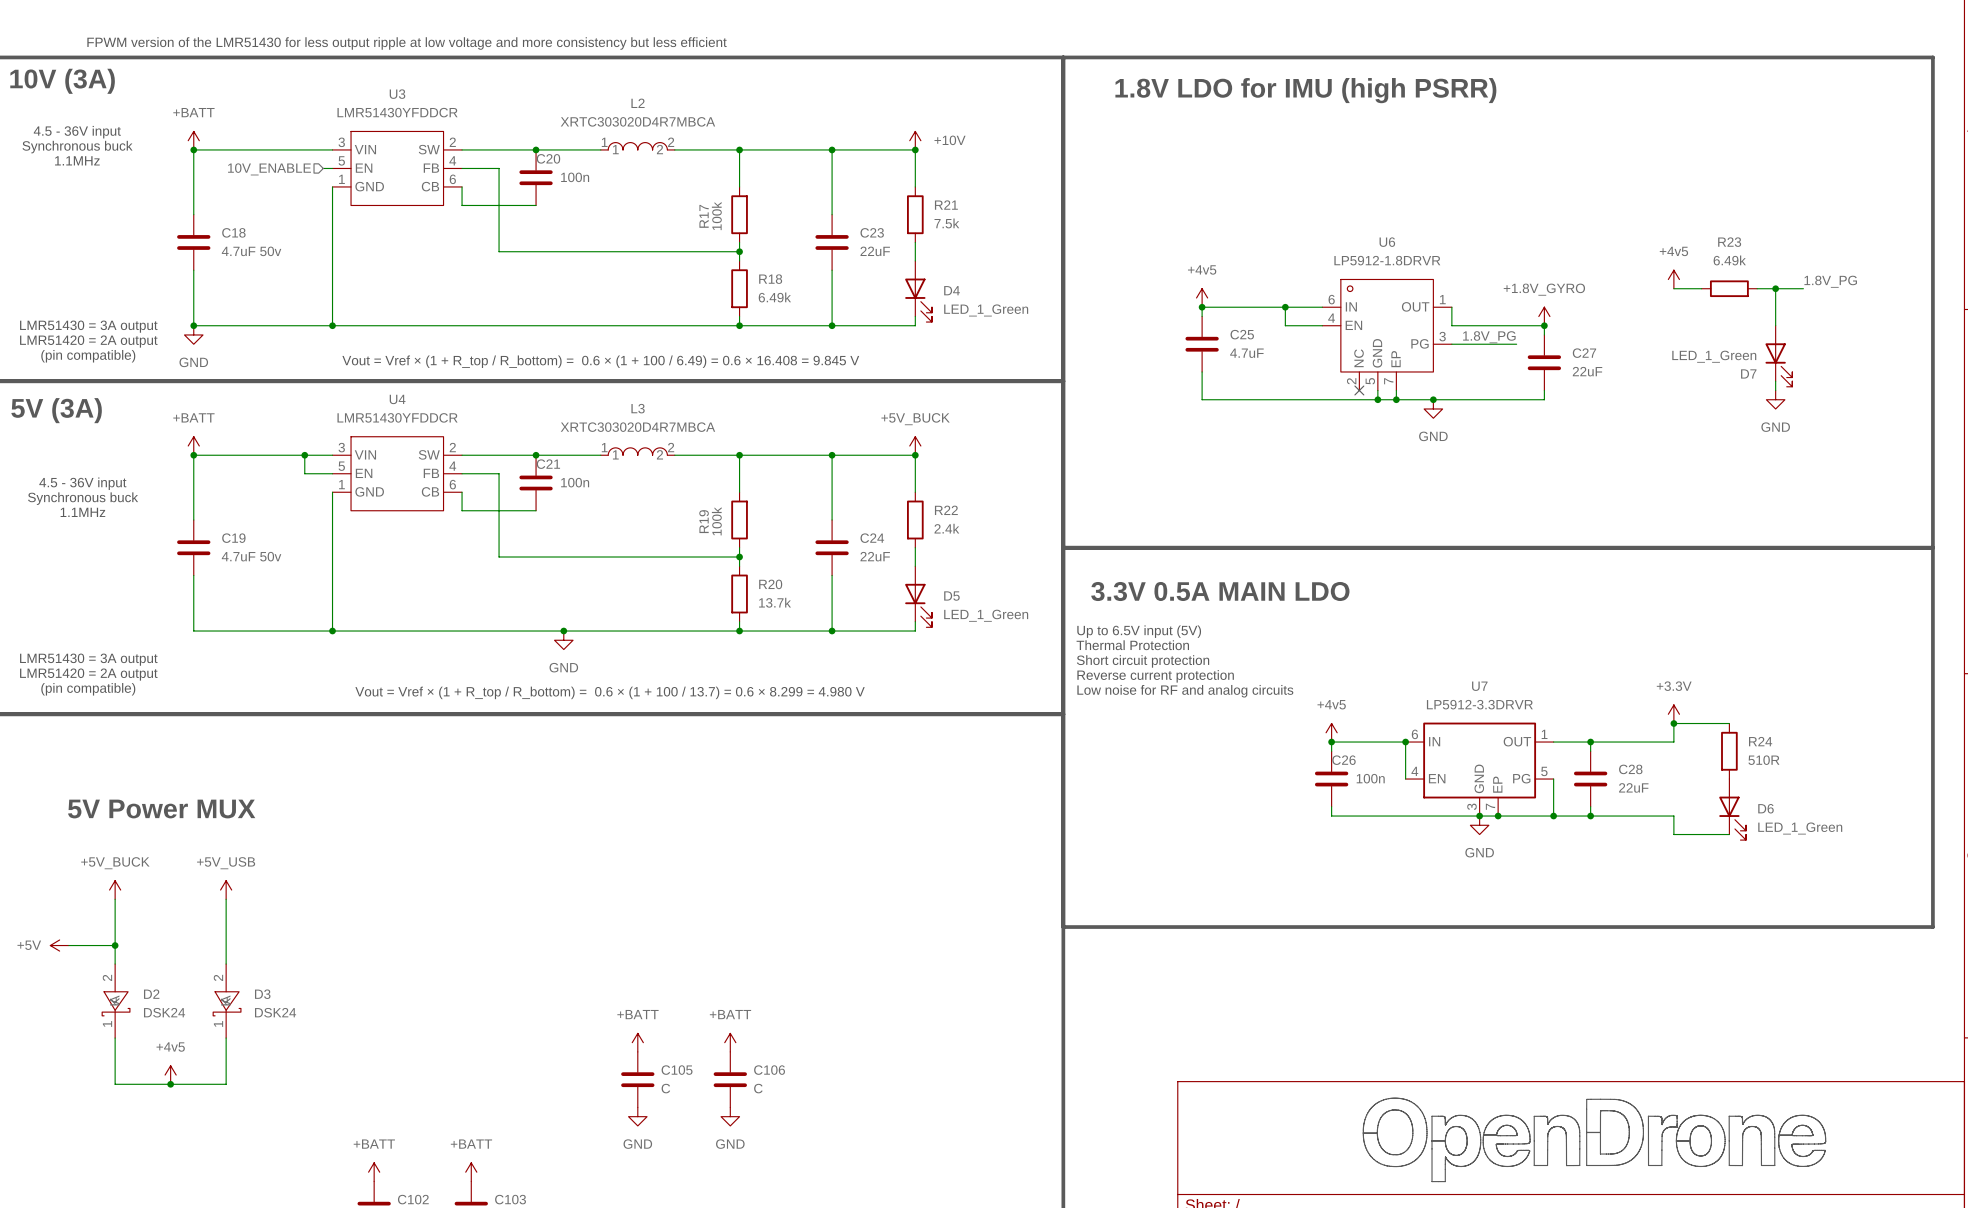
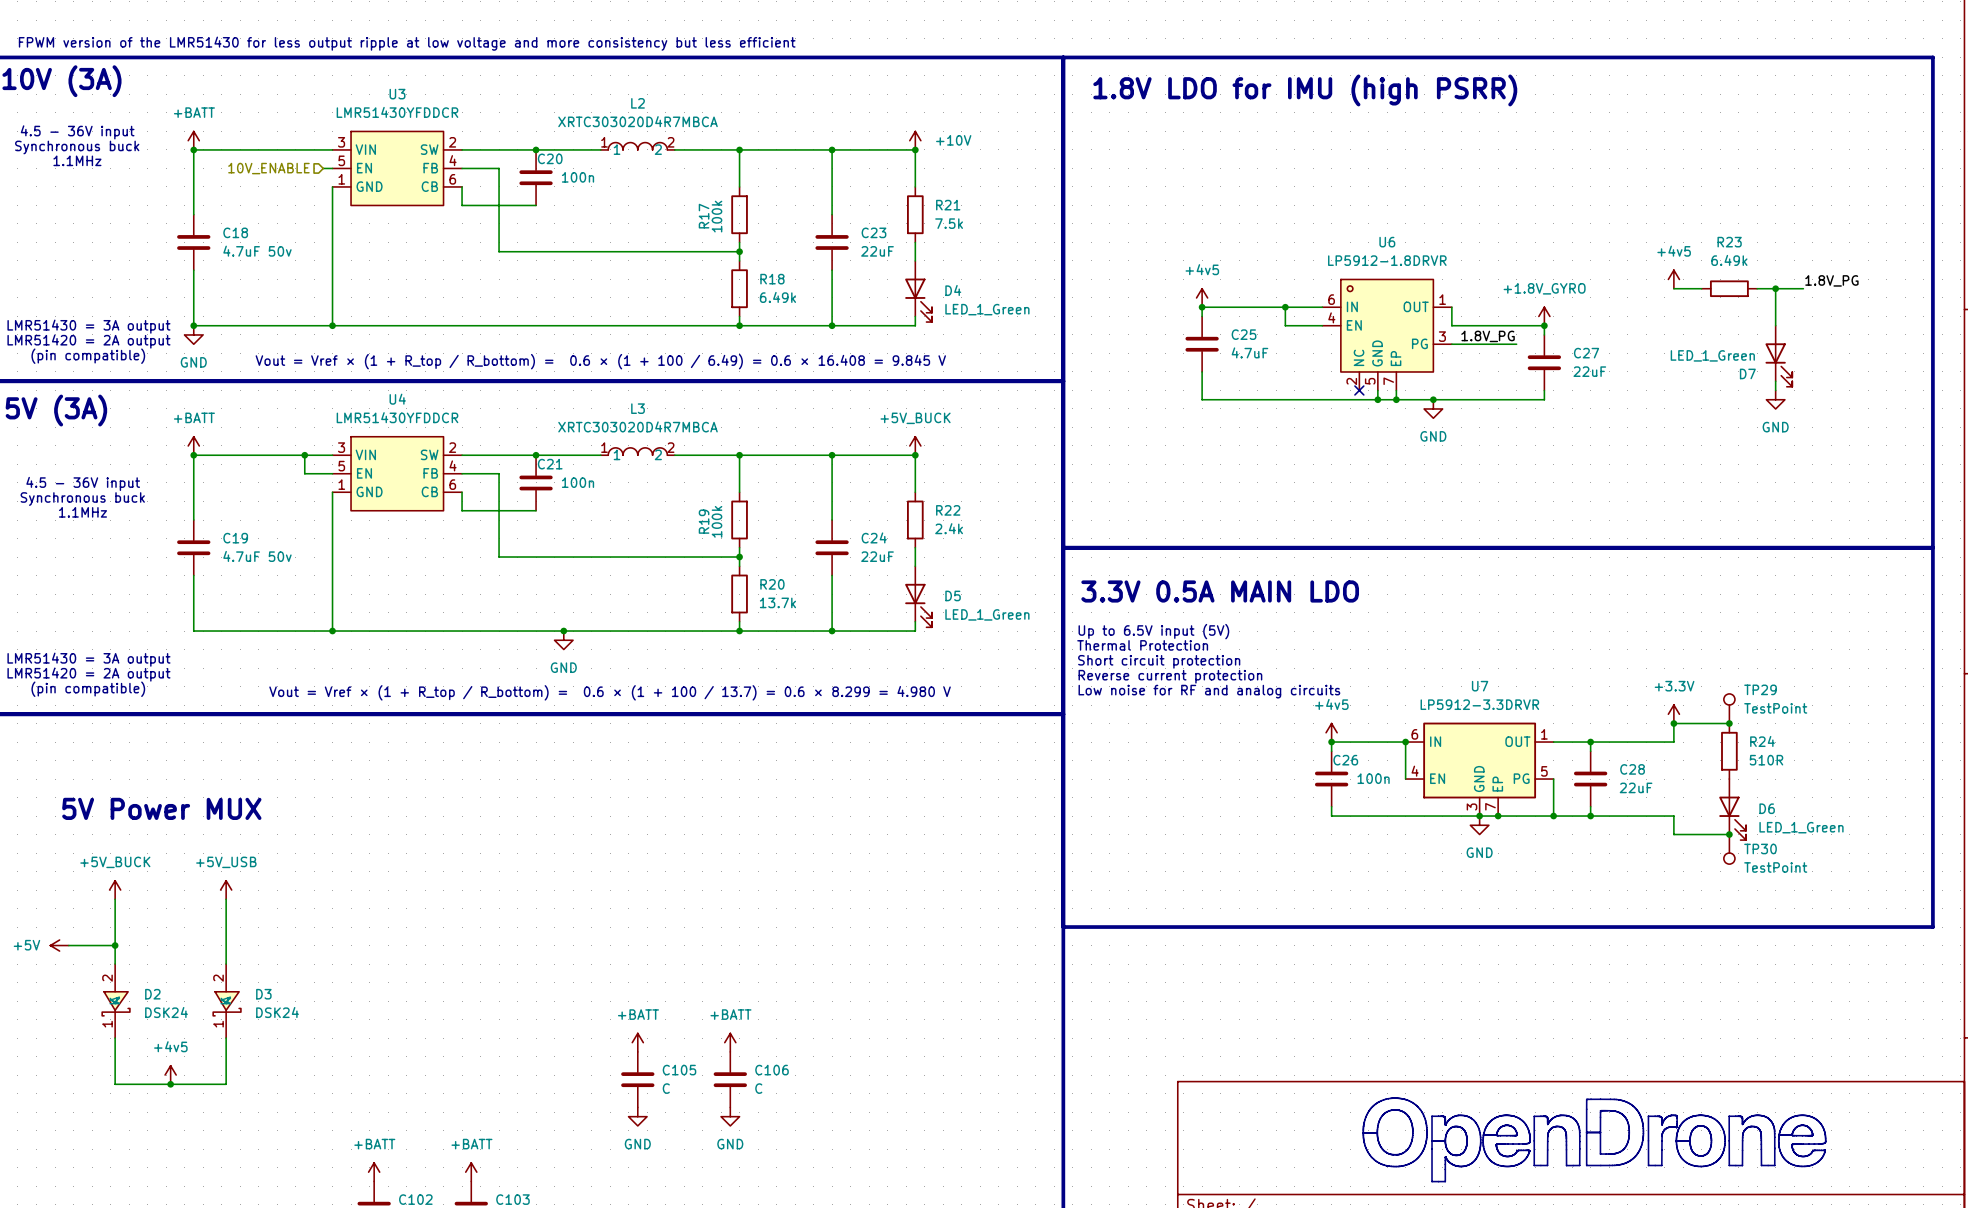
TP29: none -> TestPoint (1729, 708)
junction: none -> (1729, 723)
junction: none -> (1729, 834)
TP30: none -> TestPoint (1729, 849)

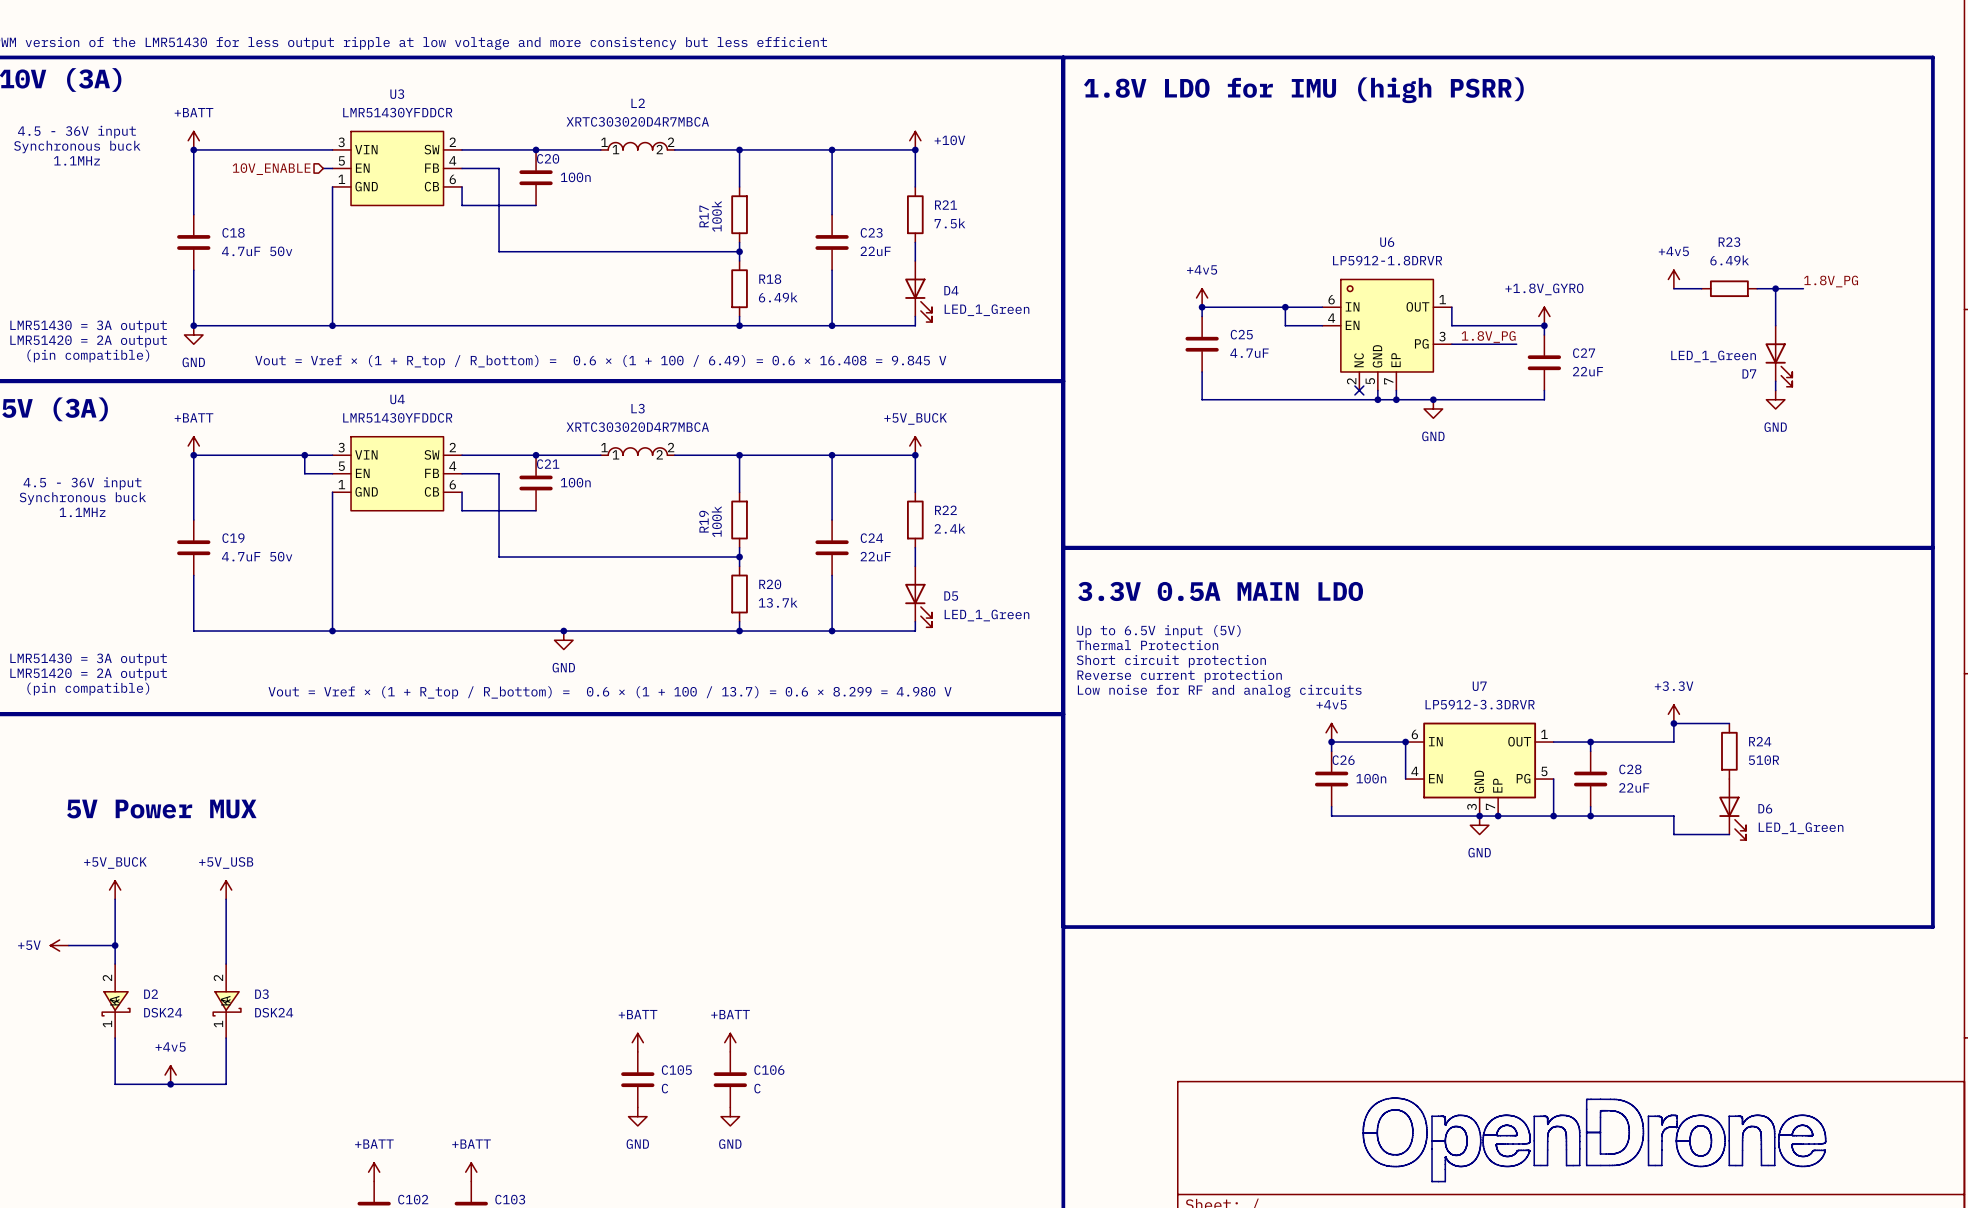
TP29: TestPoint (1729, 708) -> none
junction: (1729, 723) -> none
junction: (1729, 834) -> none
TP30: TestPoint (1729, 849) -> none

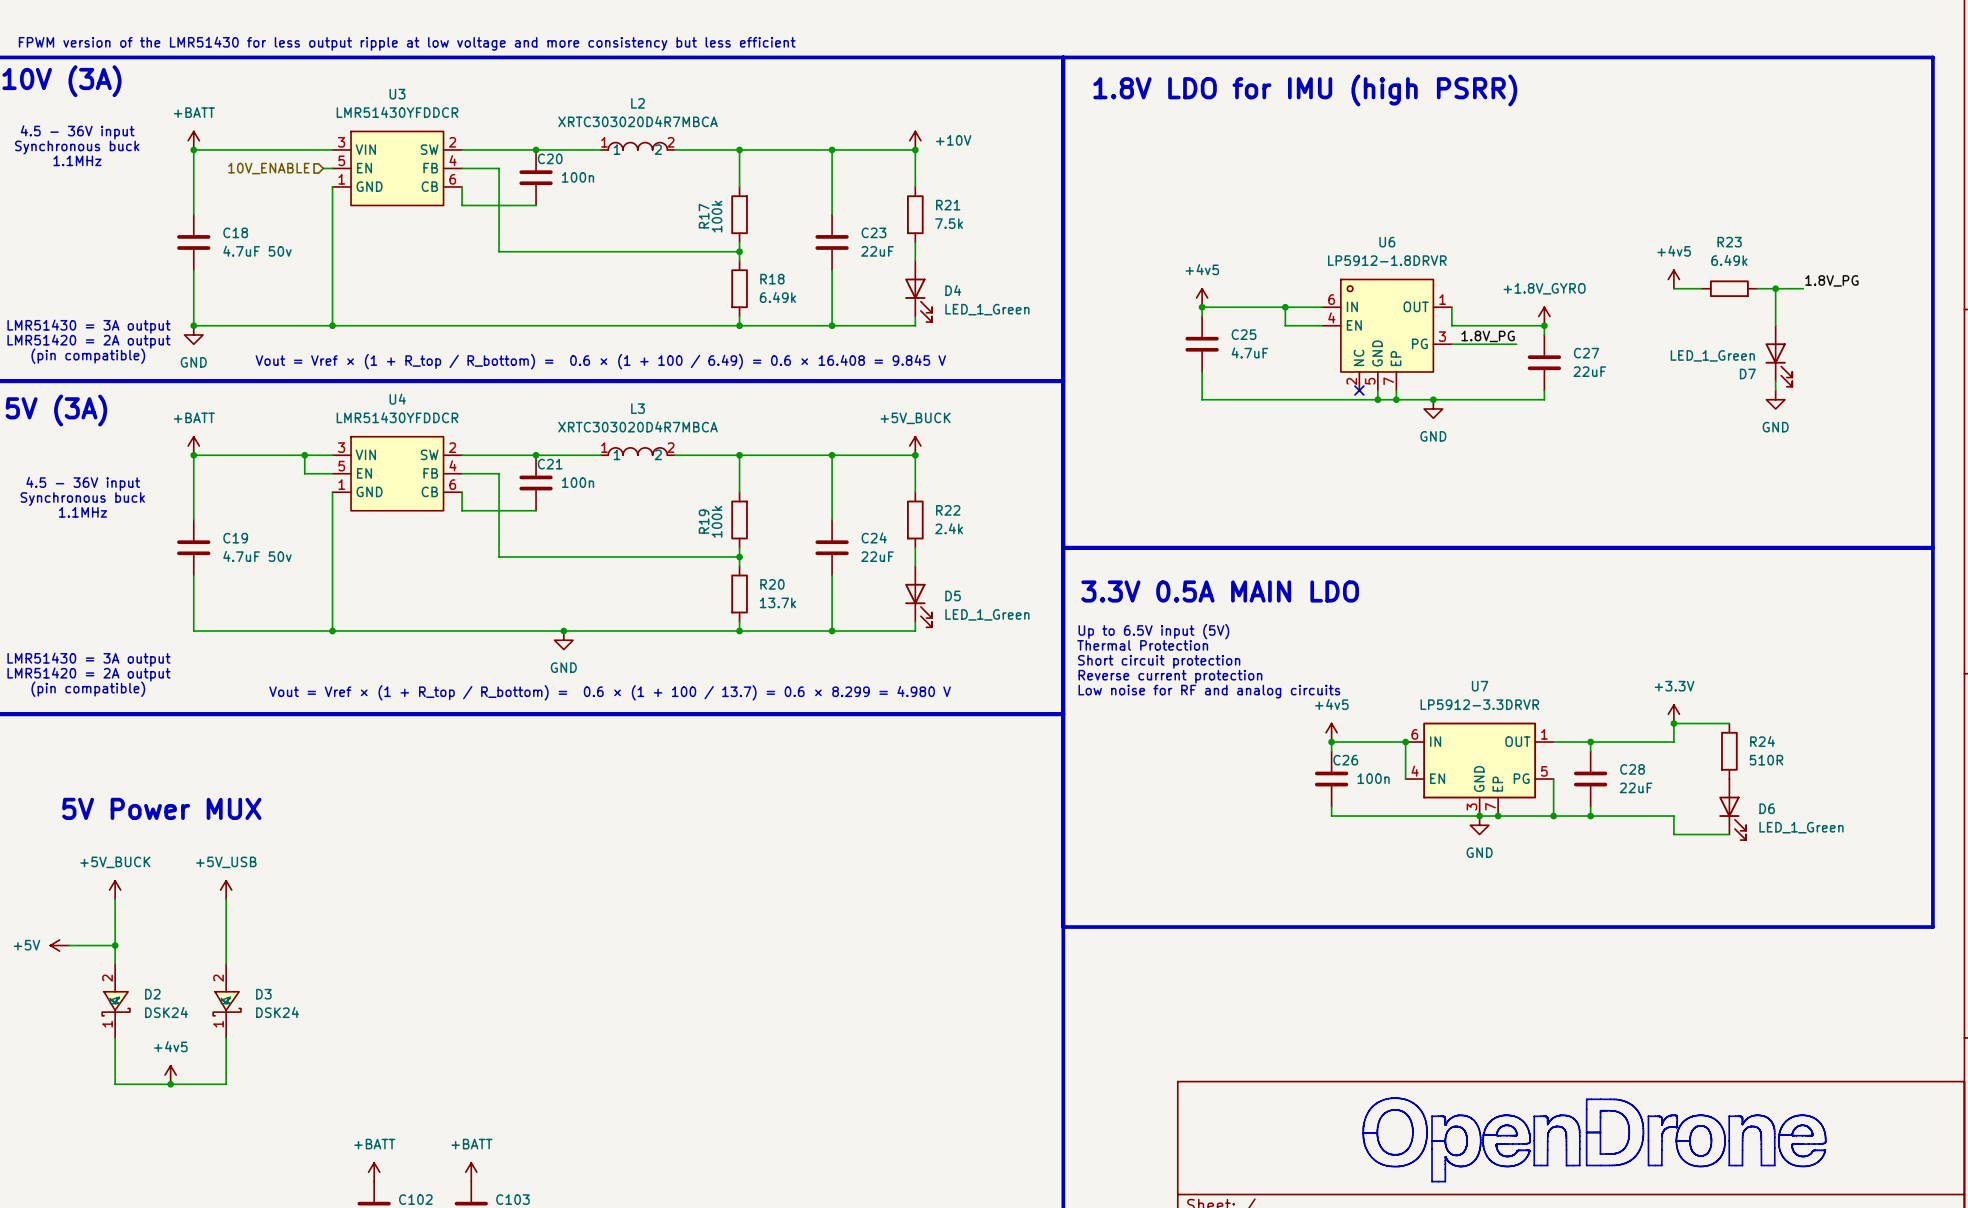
power symbol: +BATT (637, 1042) -> none
power symbol: +BATT (730, 1042) -> none
C105: C (637, 1079) -> none
C106: C (730, 1079) -> none
power symbol: GND (637, 1116) -> none
power symbol: GND (730, 1116) -> none

